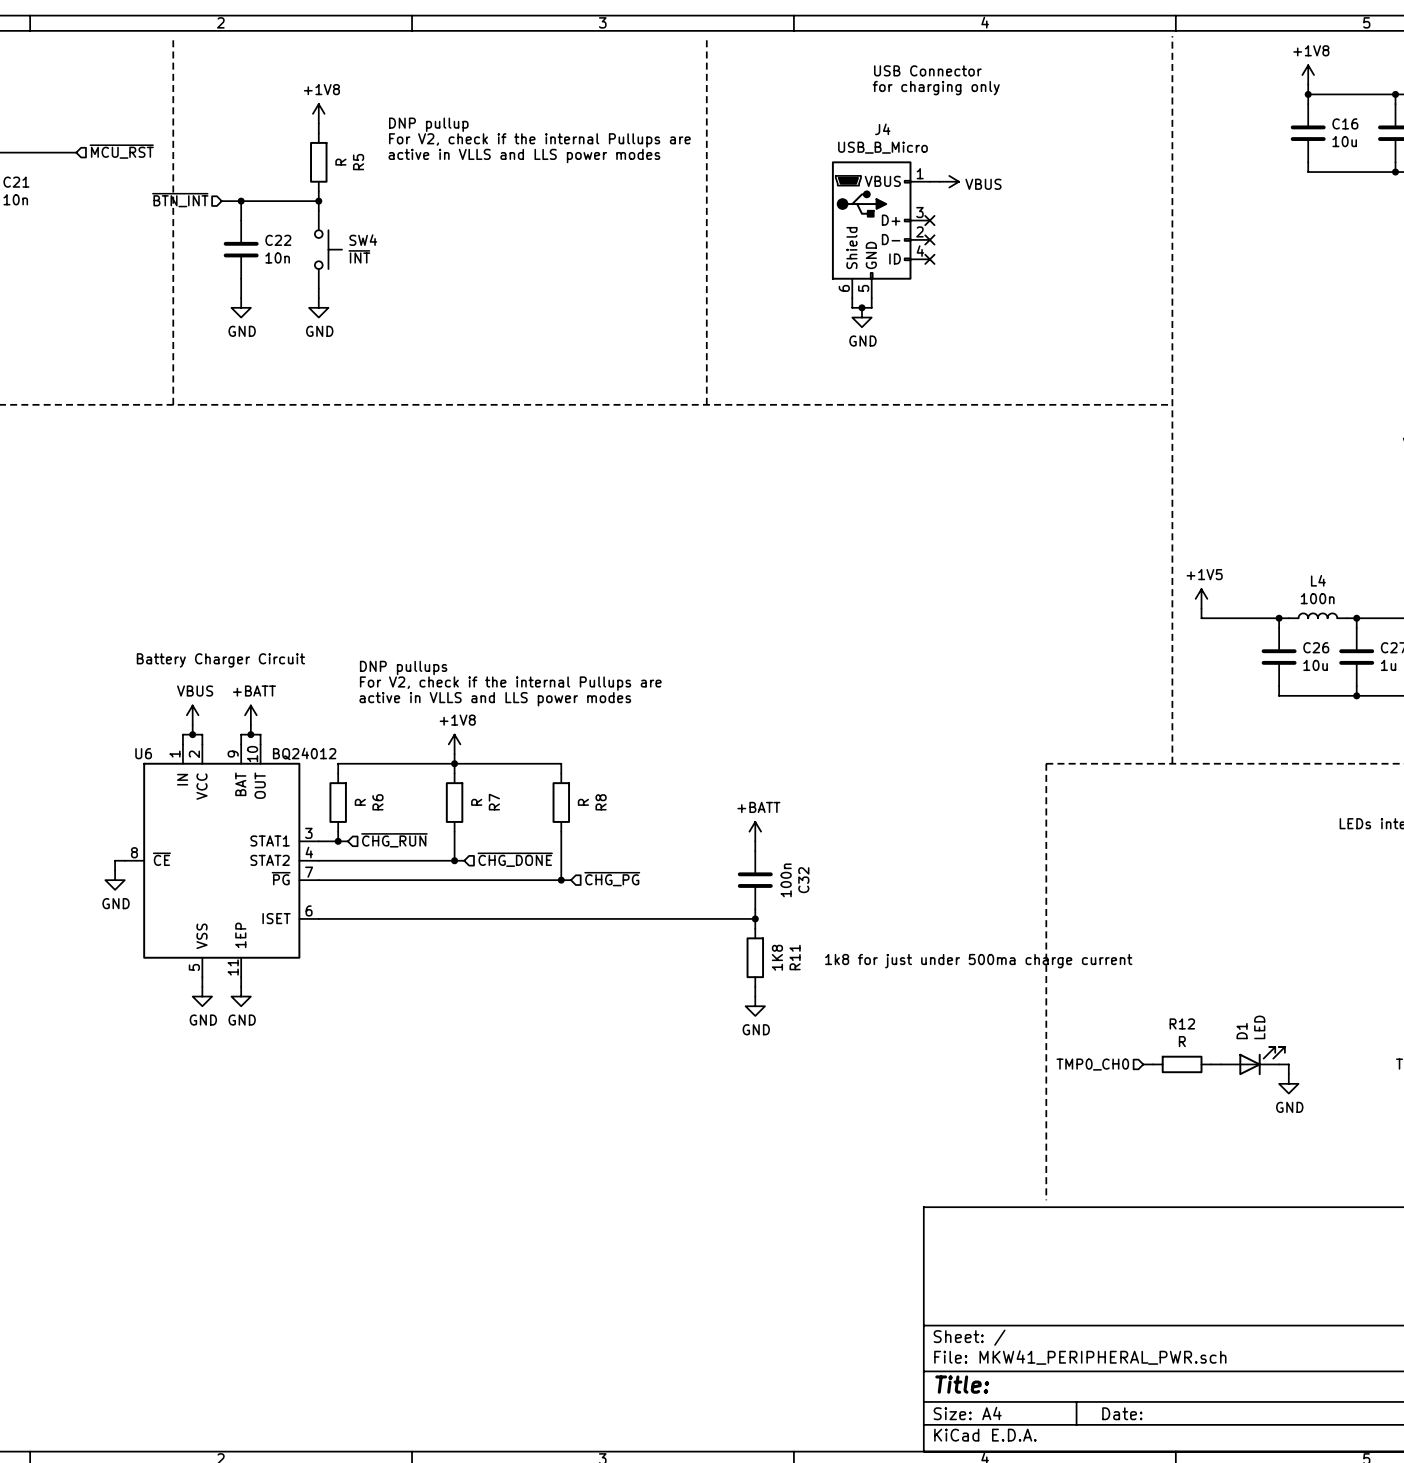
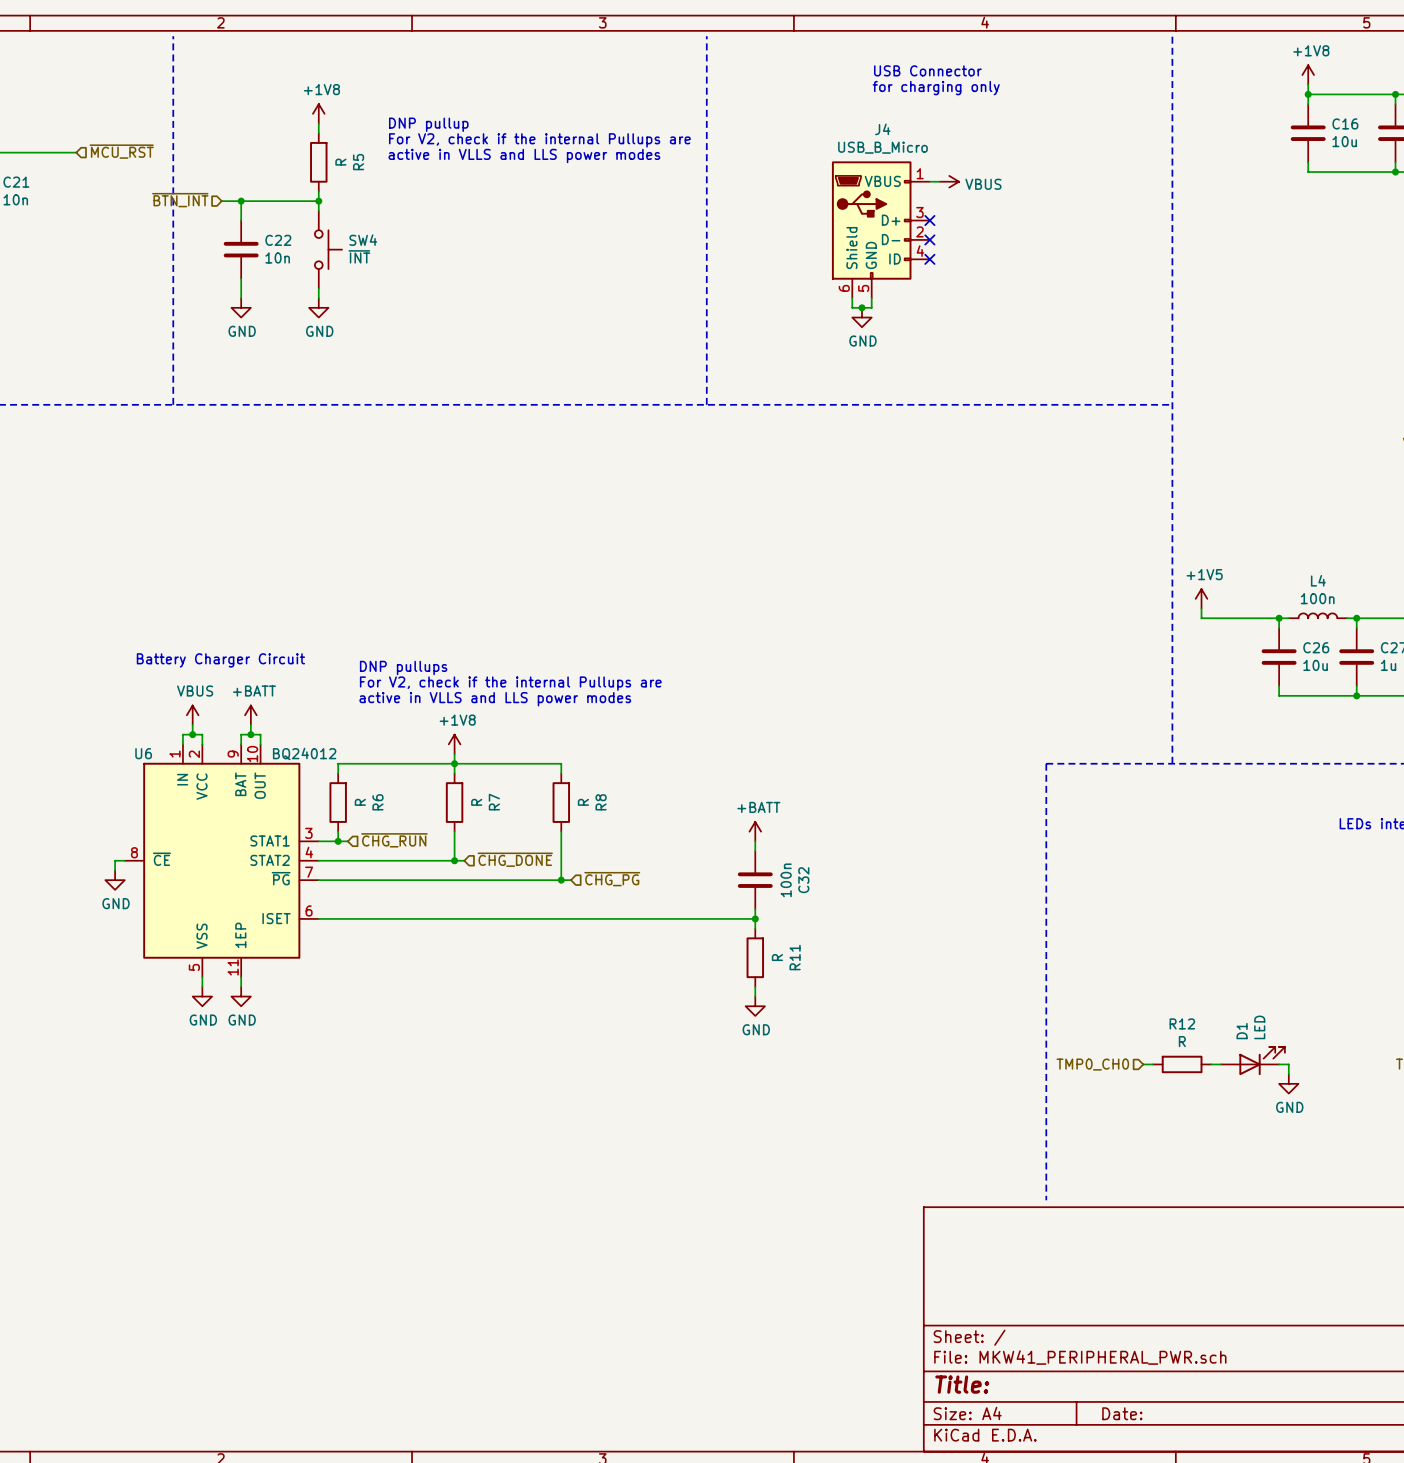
R11 value: 1K8 (777, 957) -> R (777, 957)
text: 1k8 for just under 500ma charge current (978, 961) -> none

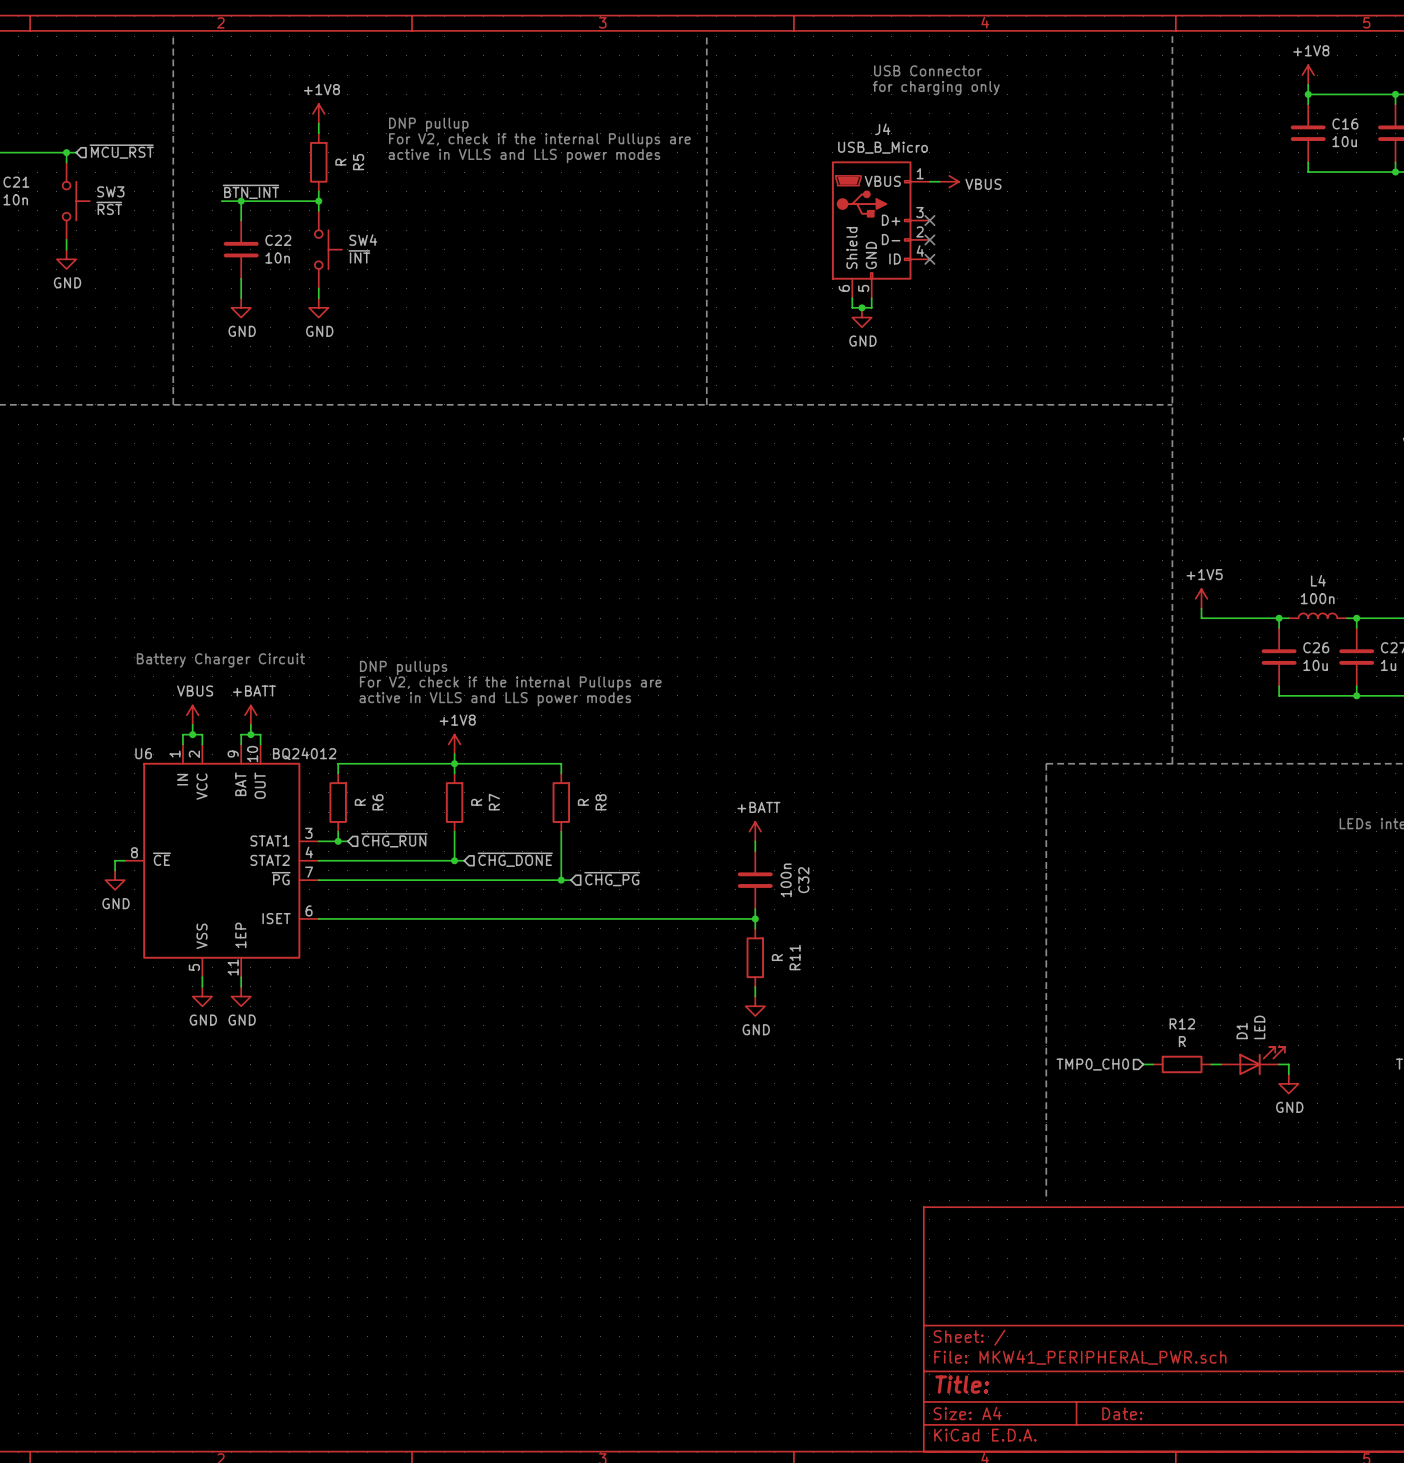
wire: none -> (66, 152) (66, 162)
junction: none -> (66, 152)
label: none -> ~{BTN_INT} (250, 191)
hierarchical label: ~{BTN_INT} (180, 200) -> none
SW3: none -> ~{RST} (76, 201)
wire: none -> (66, 239) (66, 249)
power symbol: none -> GND (66, 259)

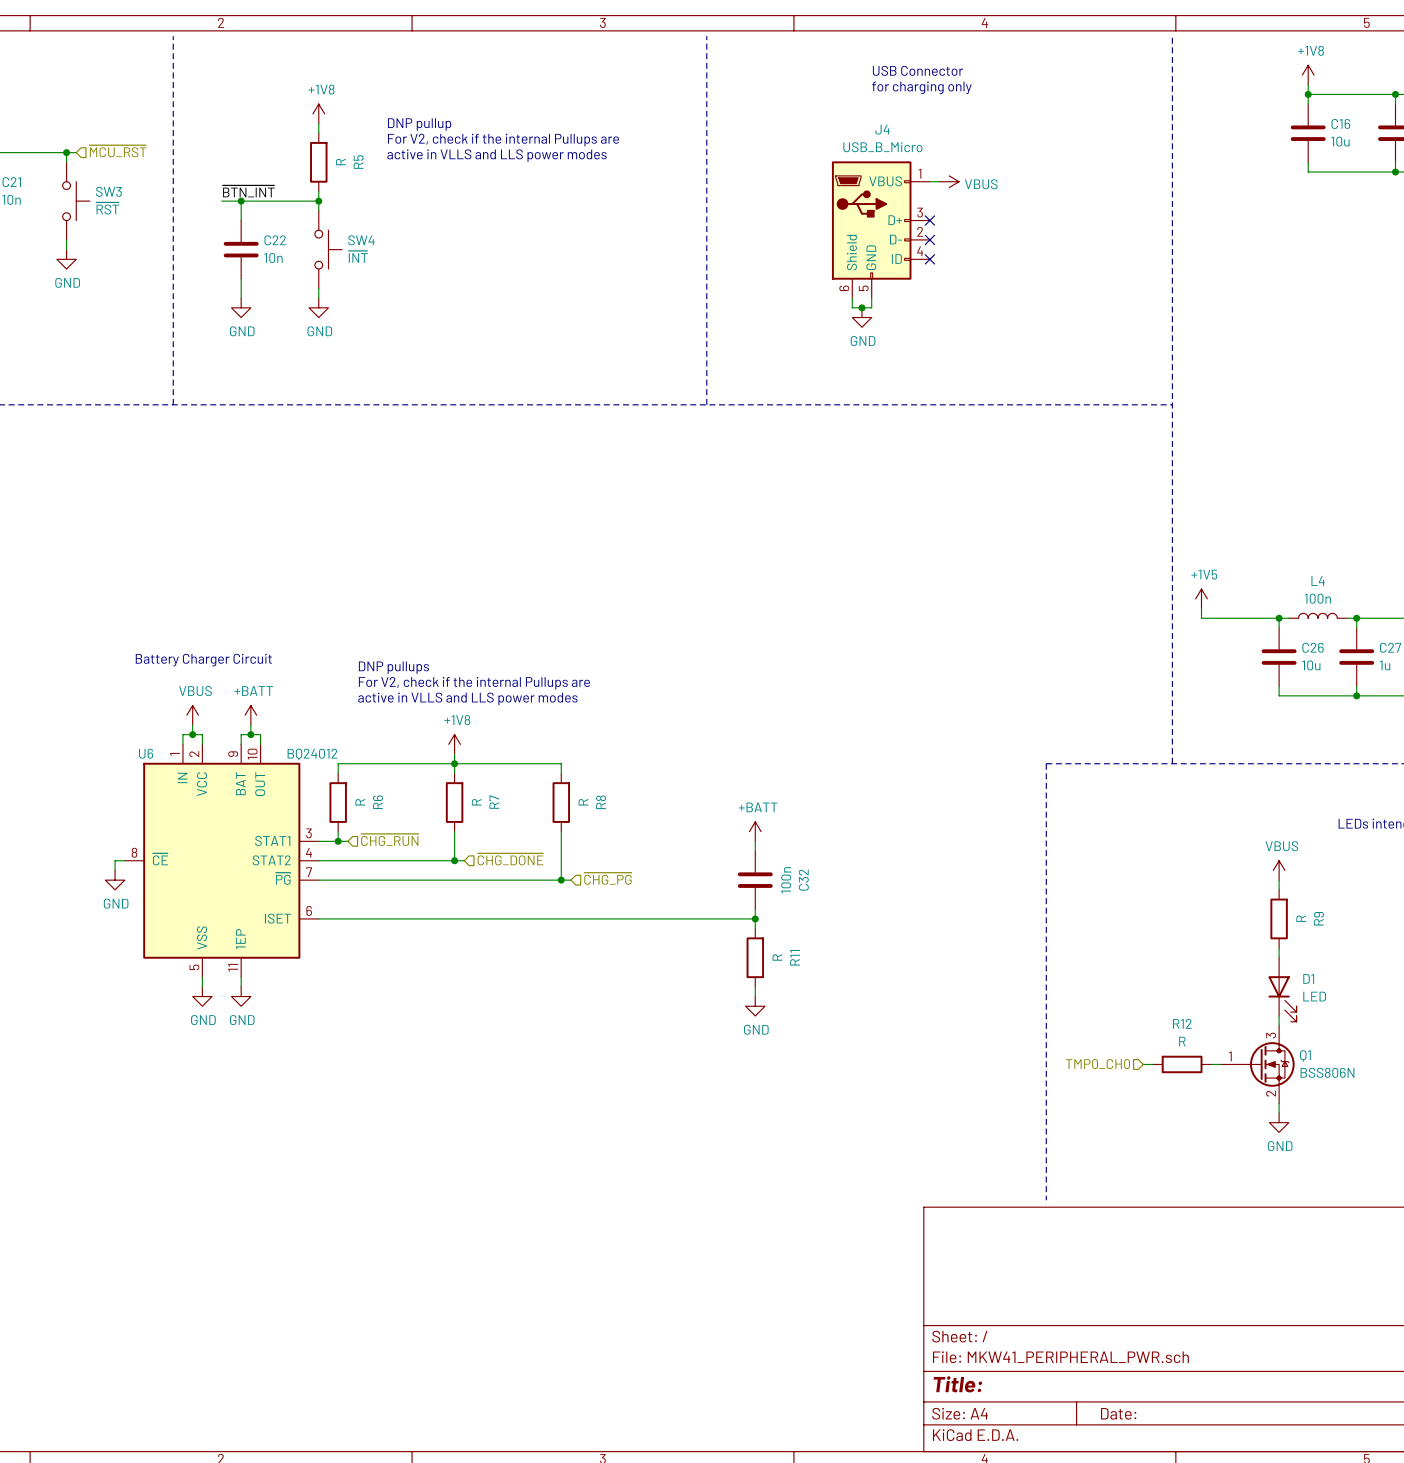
power symbol: none -> VBUS (1279, 870)
wire: none -> (1279, 880) (1279, 889)
R9: none -> R (1279, 918)
wire: none -> (1279, 948) (1279, 957)
wire: none -> (1279, 1015) (1279, 1025)
D1 position: (1252, 1061) -> (1282, 989)
D1 rotation: 0° (1262, 1061) -> 90° clockwise (1282, 998)
Q1: none -> BSS806N (1257, 1064)
wire: (1279, 1064) (1288, 1064) (1288, 1074) -> none
power symbol position: GND (1288, 1083) -> GND (1279, 1122)
wire: none -> (1279, 1103) (1279, 1112)

